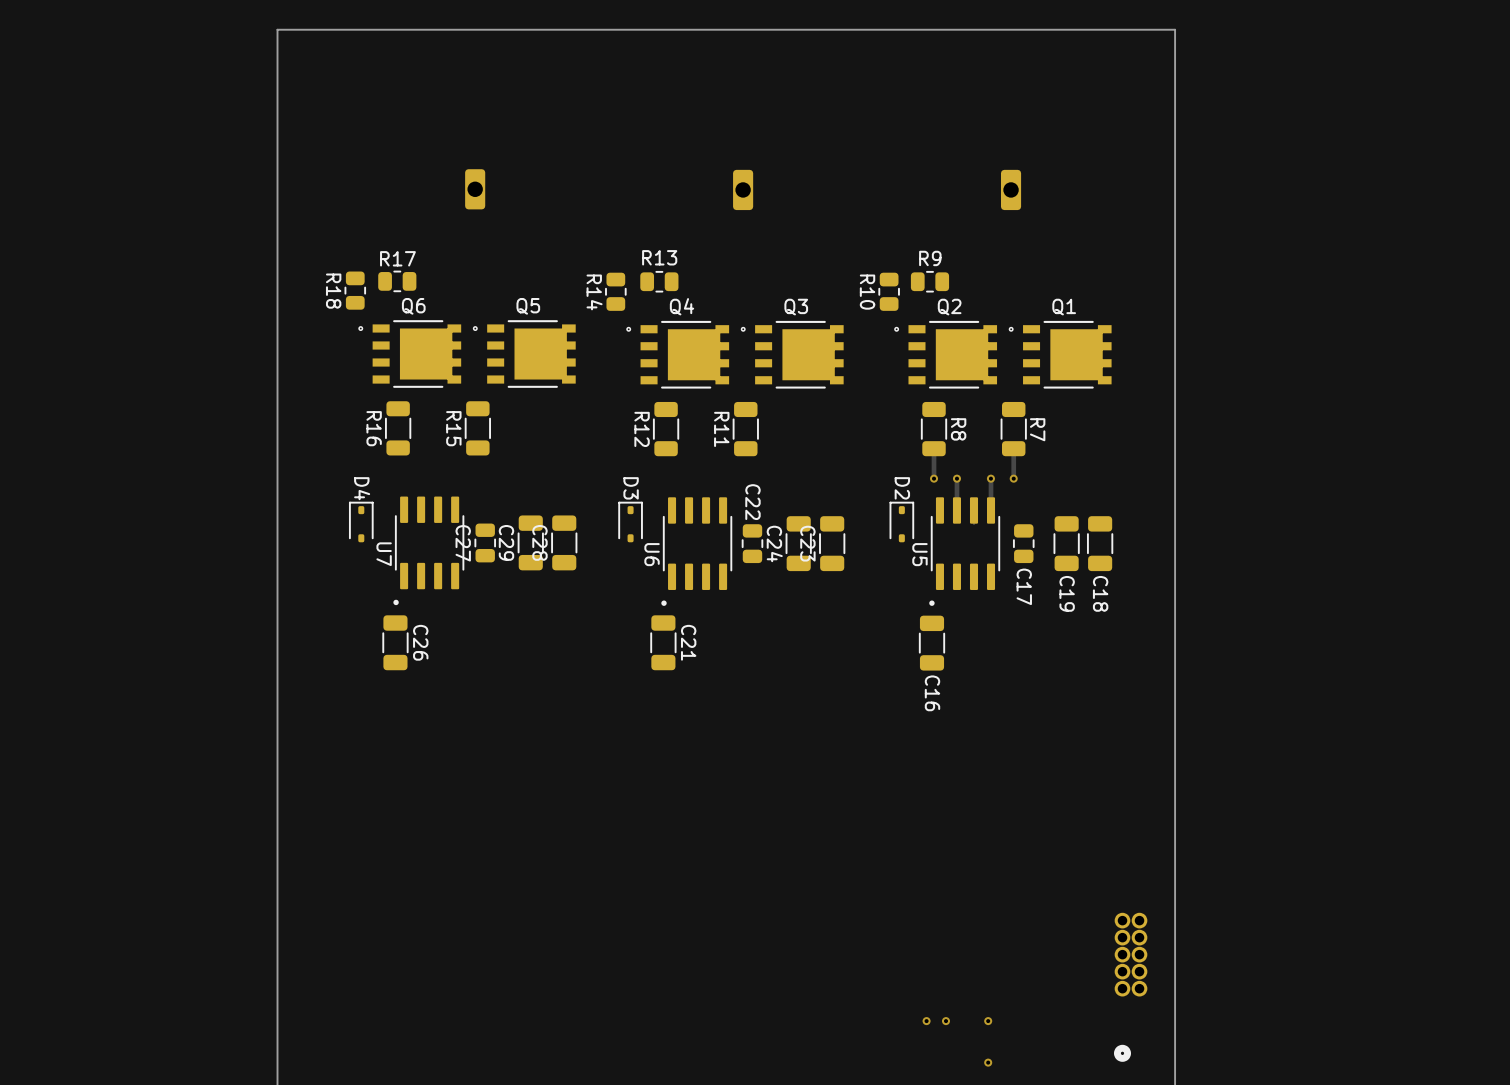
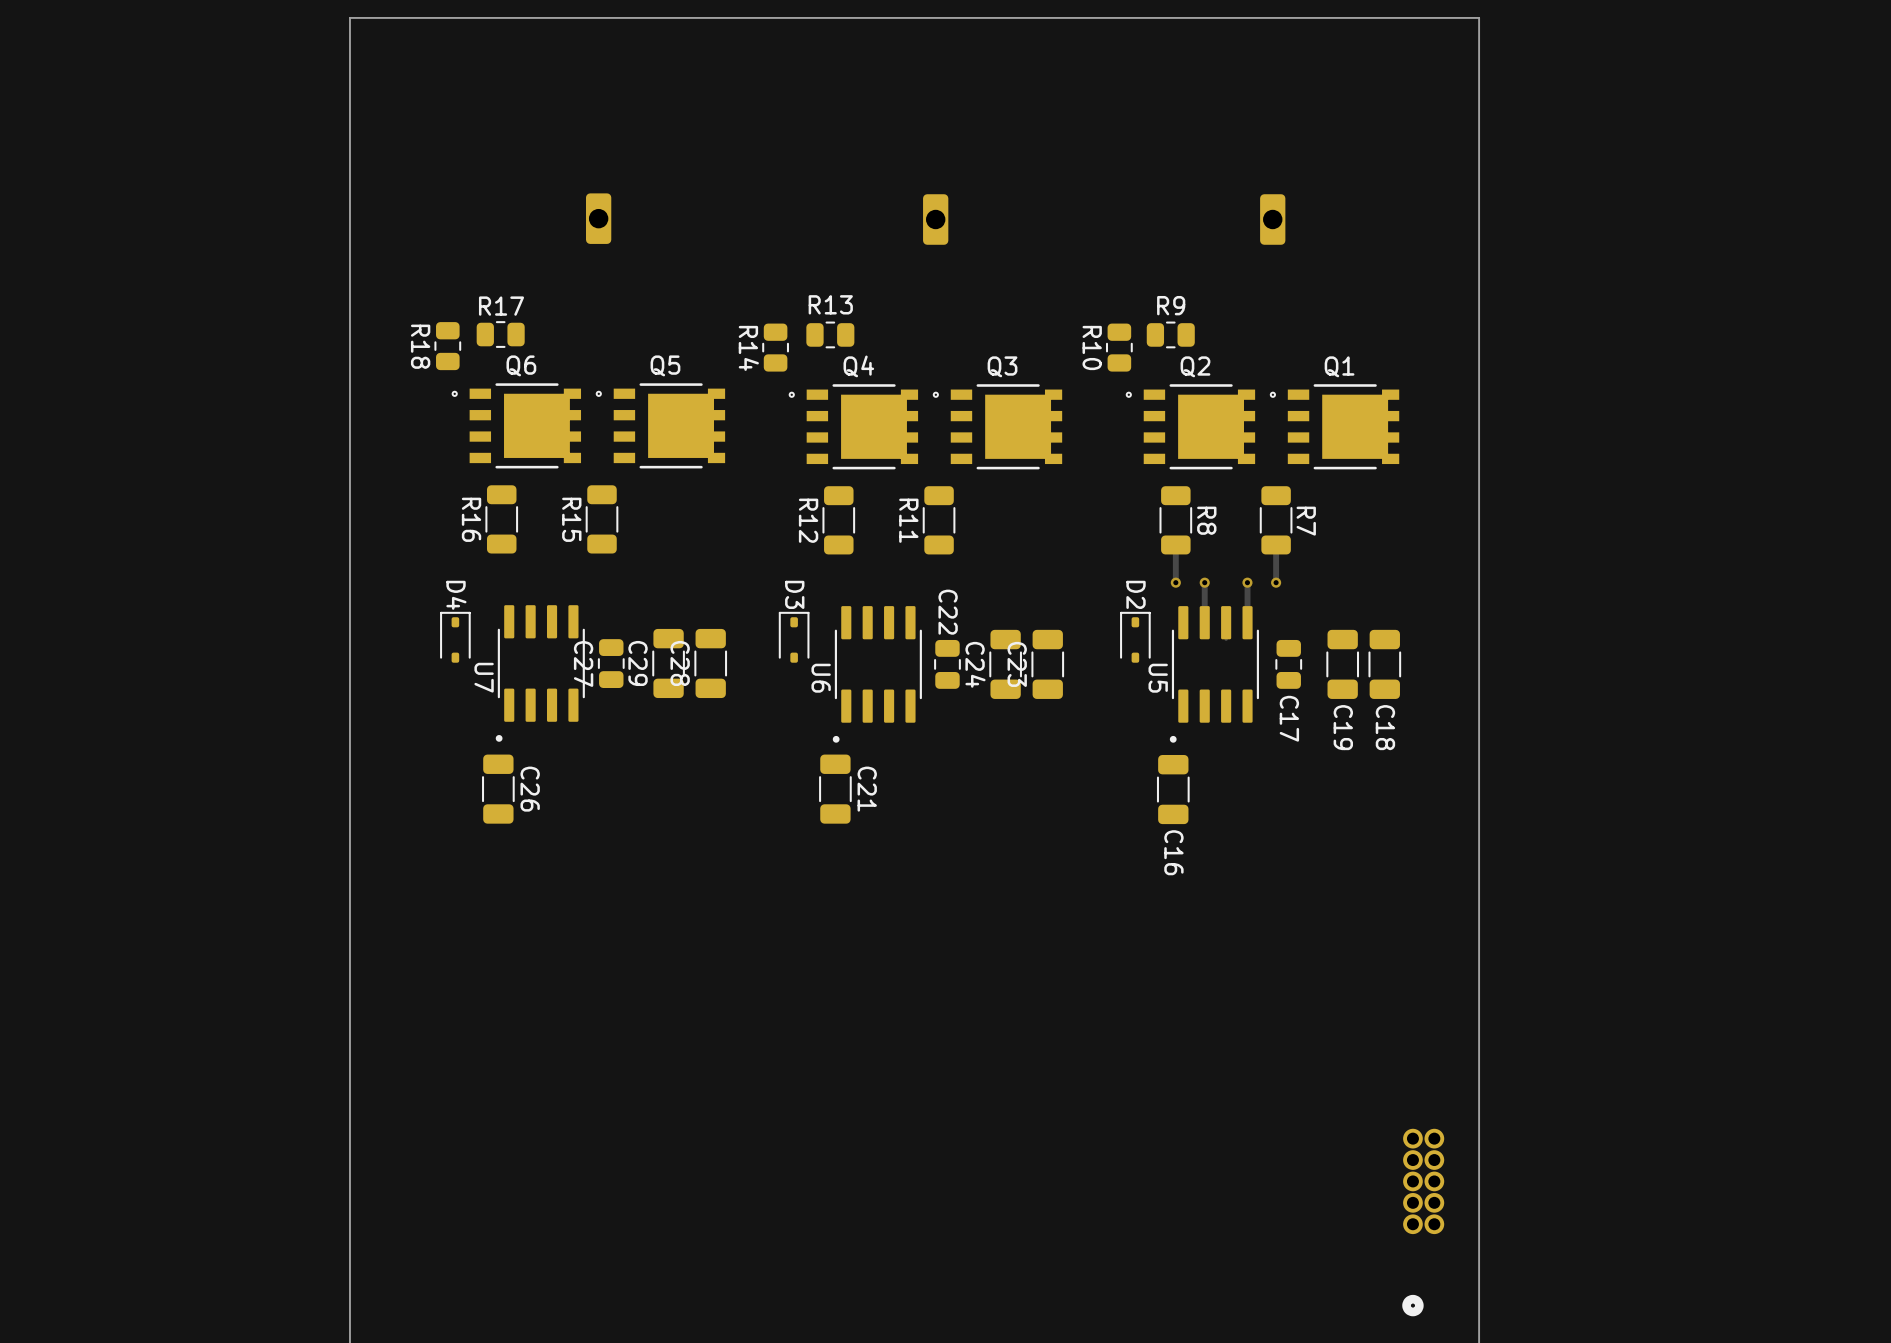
via: (926, 1021) -> none
via: (946, 1021) -> none
via: (988, 1021) -> none
via: (988, 1062) -> none

